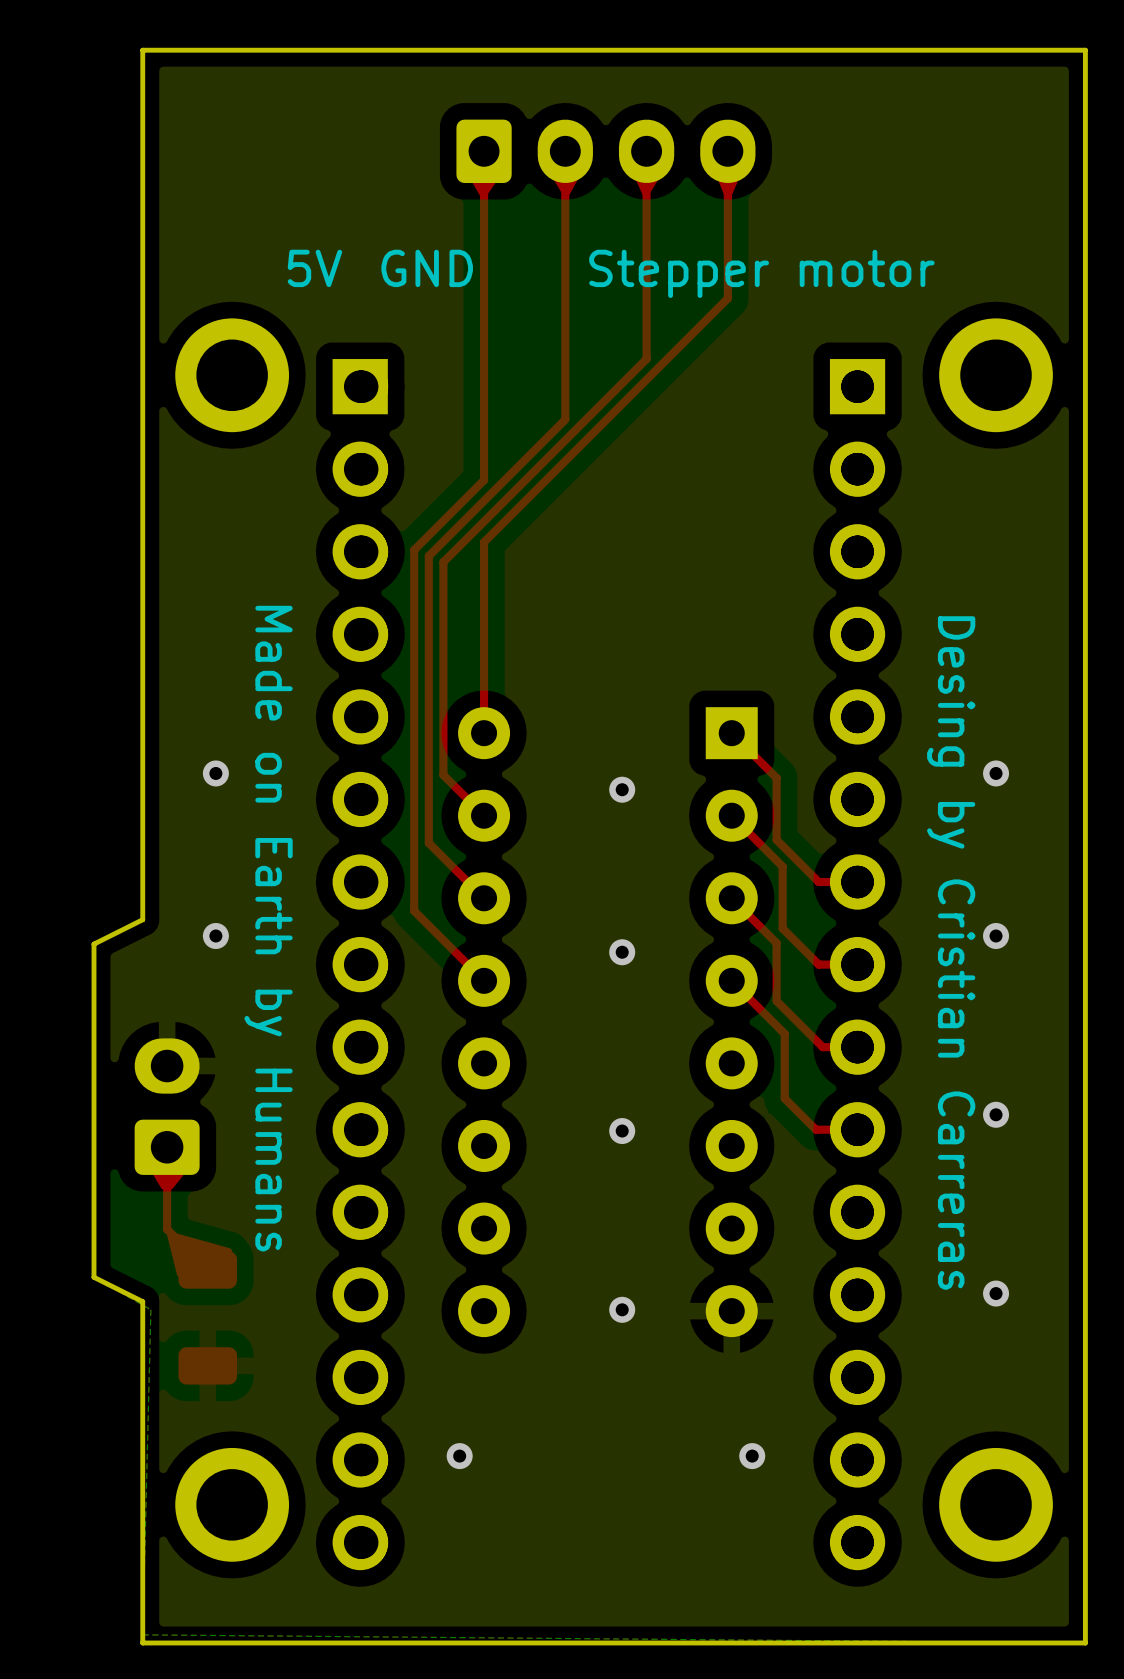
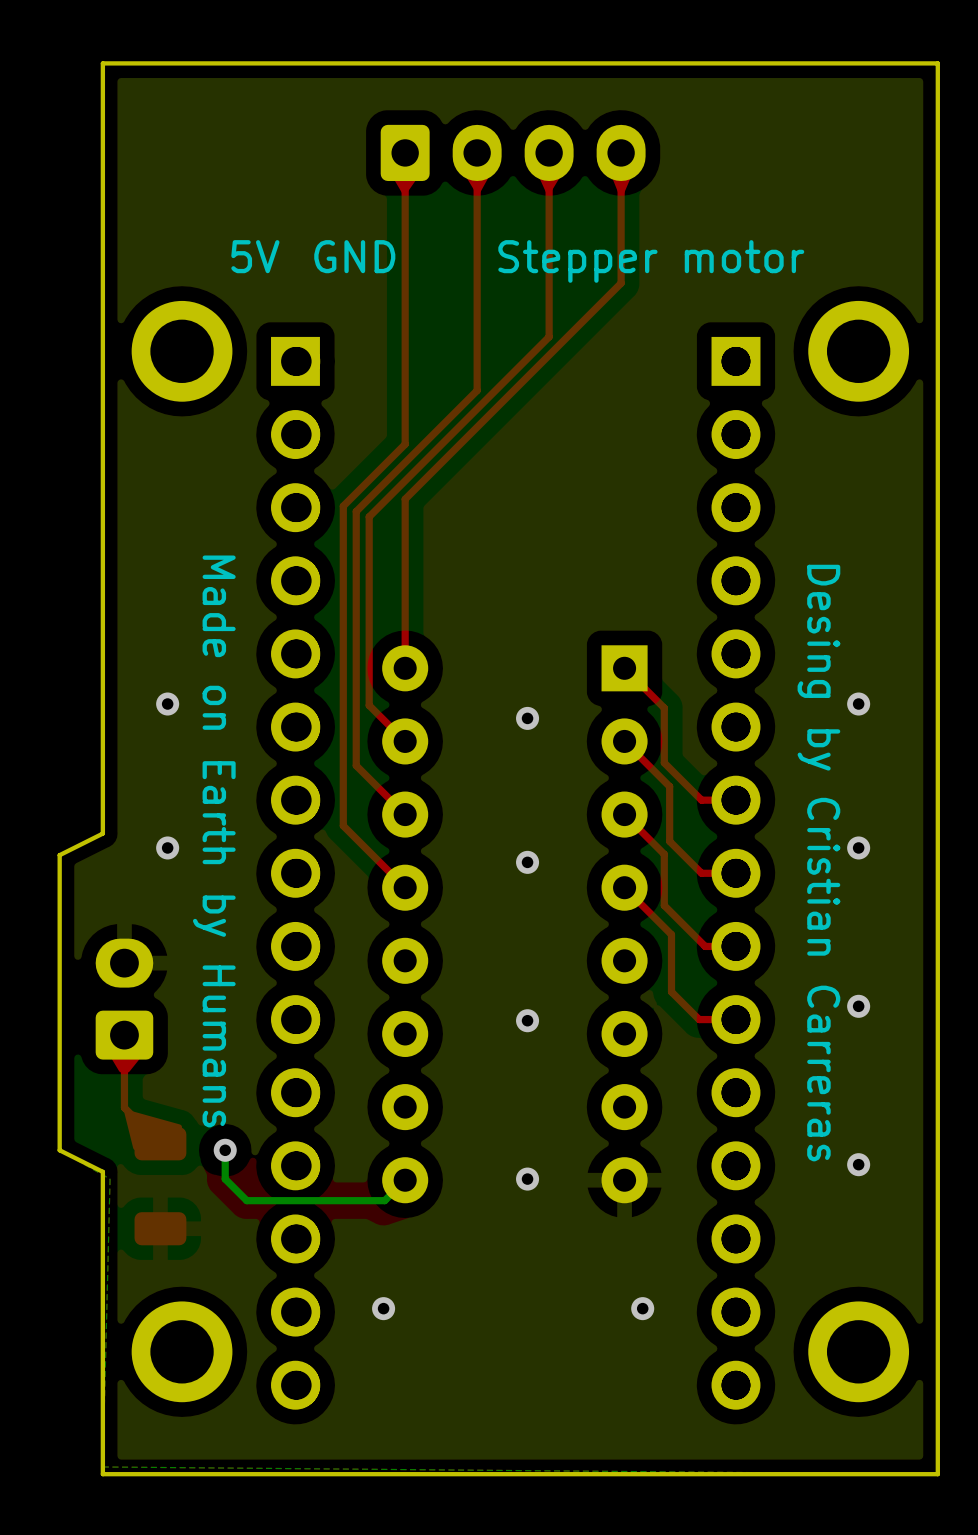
bottom track: none -> (225, 1150) (225, 1179) (246, 1200) (384, 1200) (405, 1180)
via: none -> (225, 1150)

